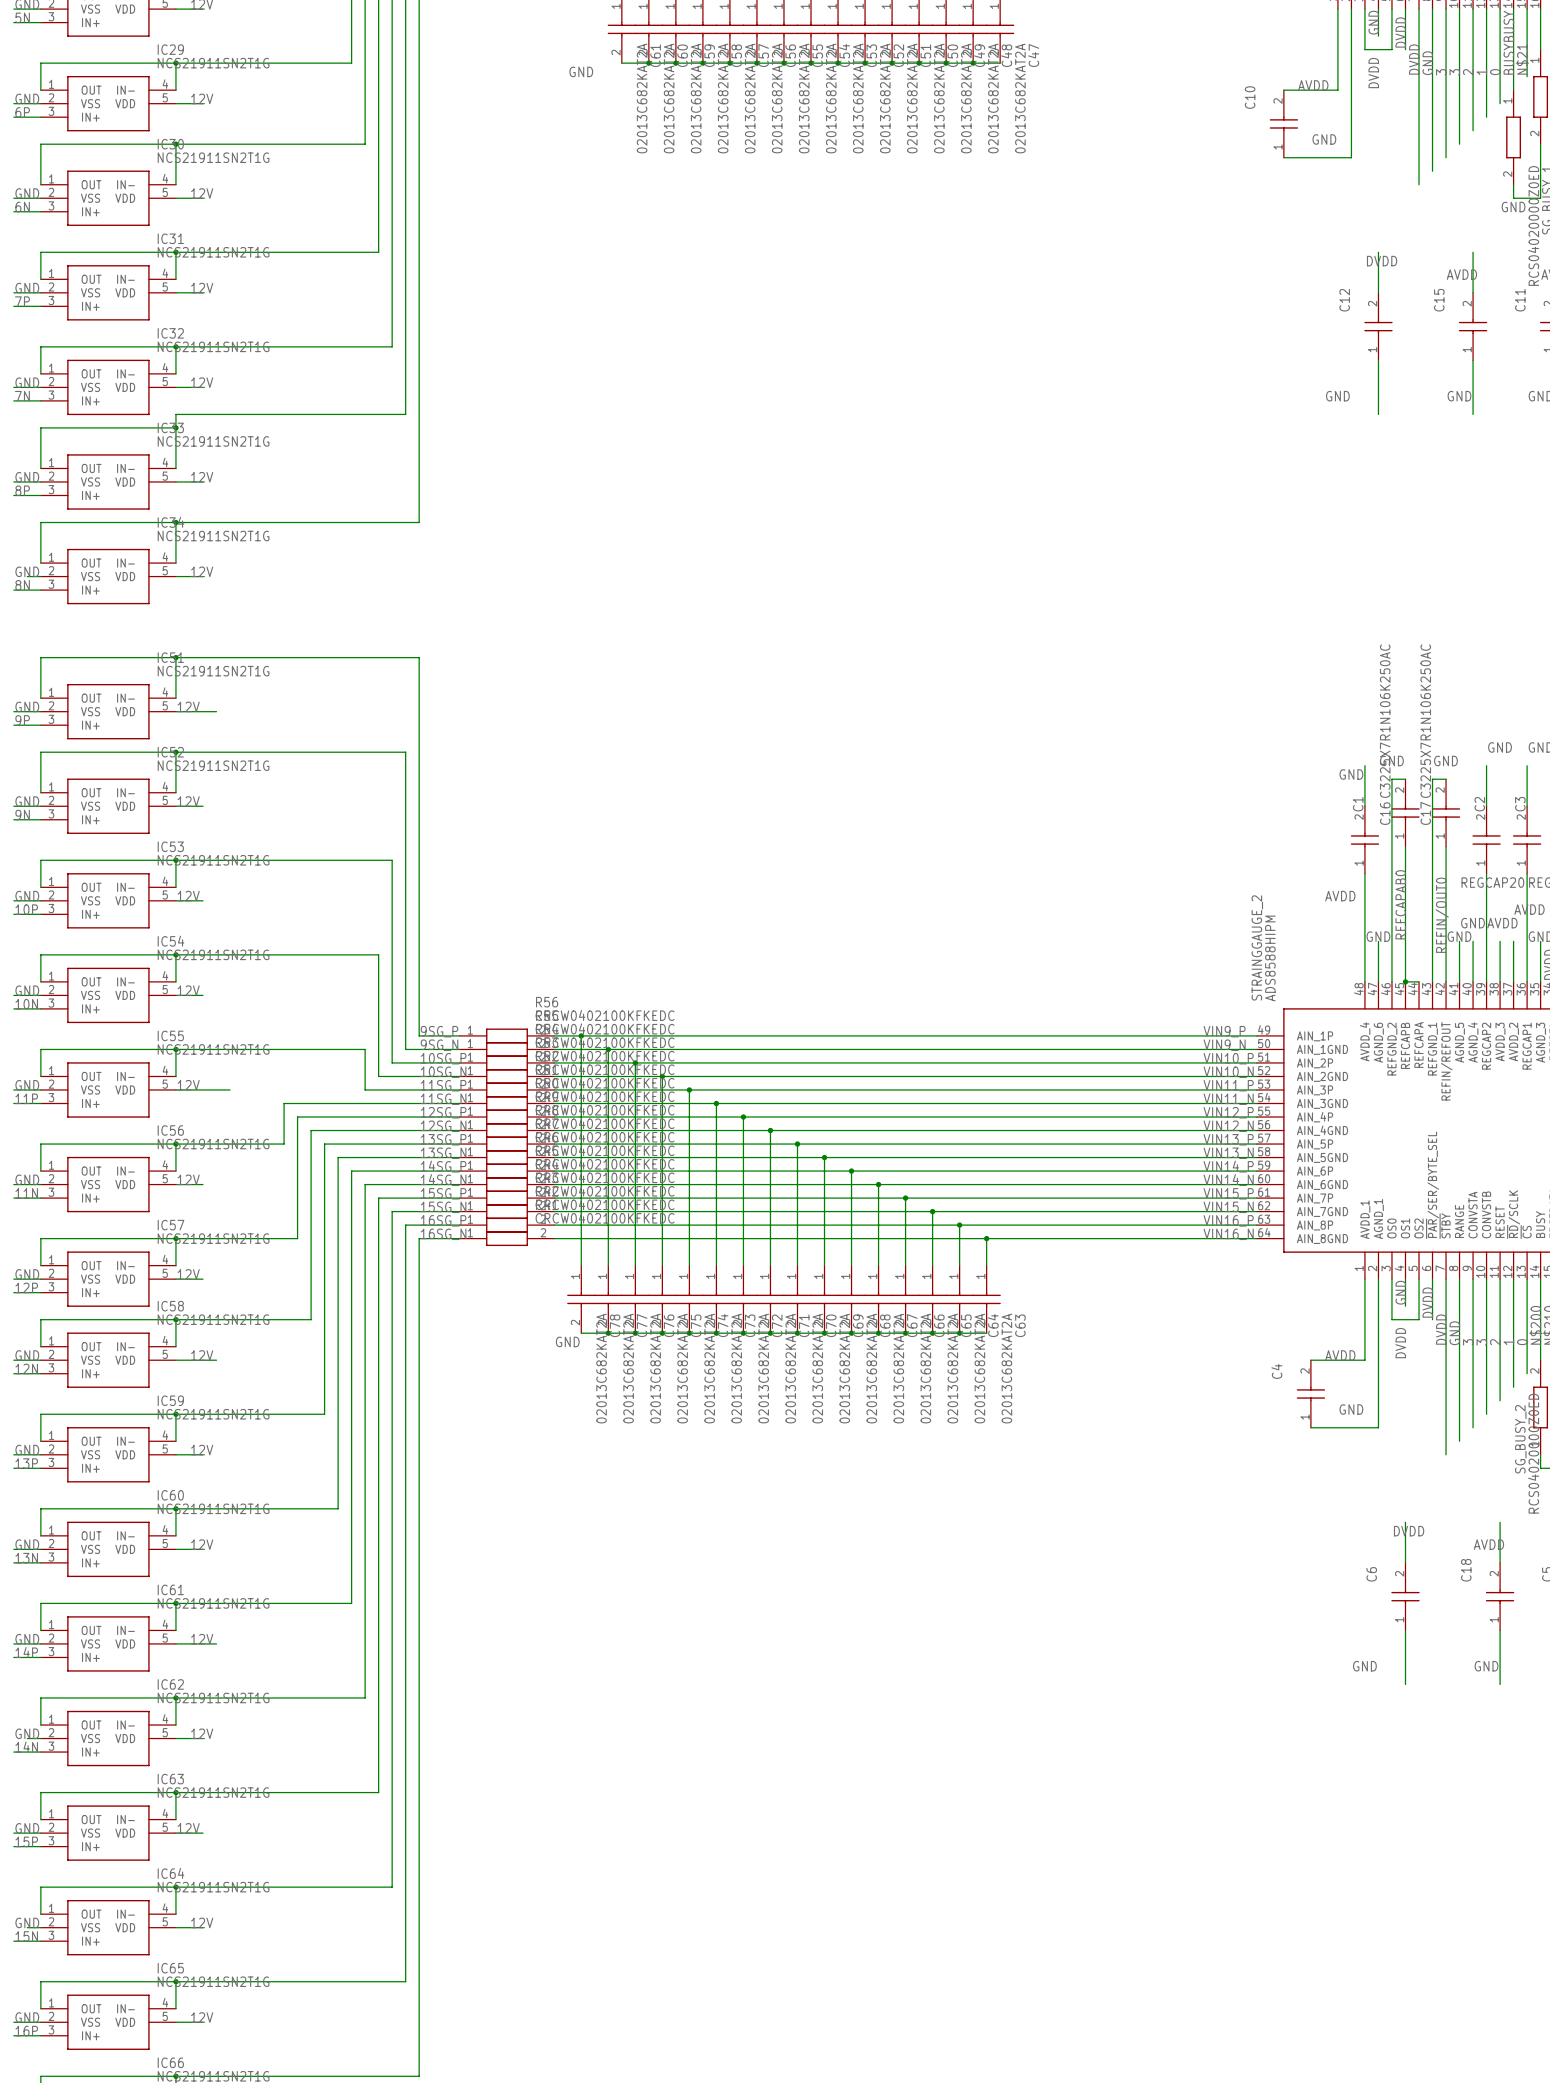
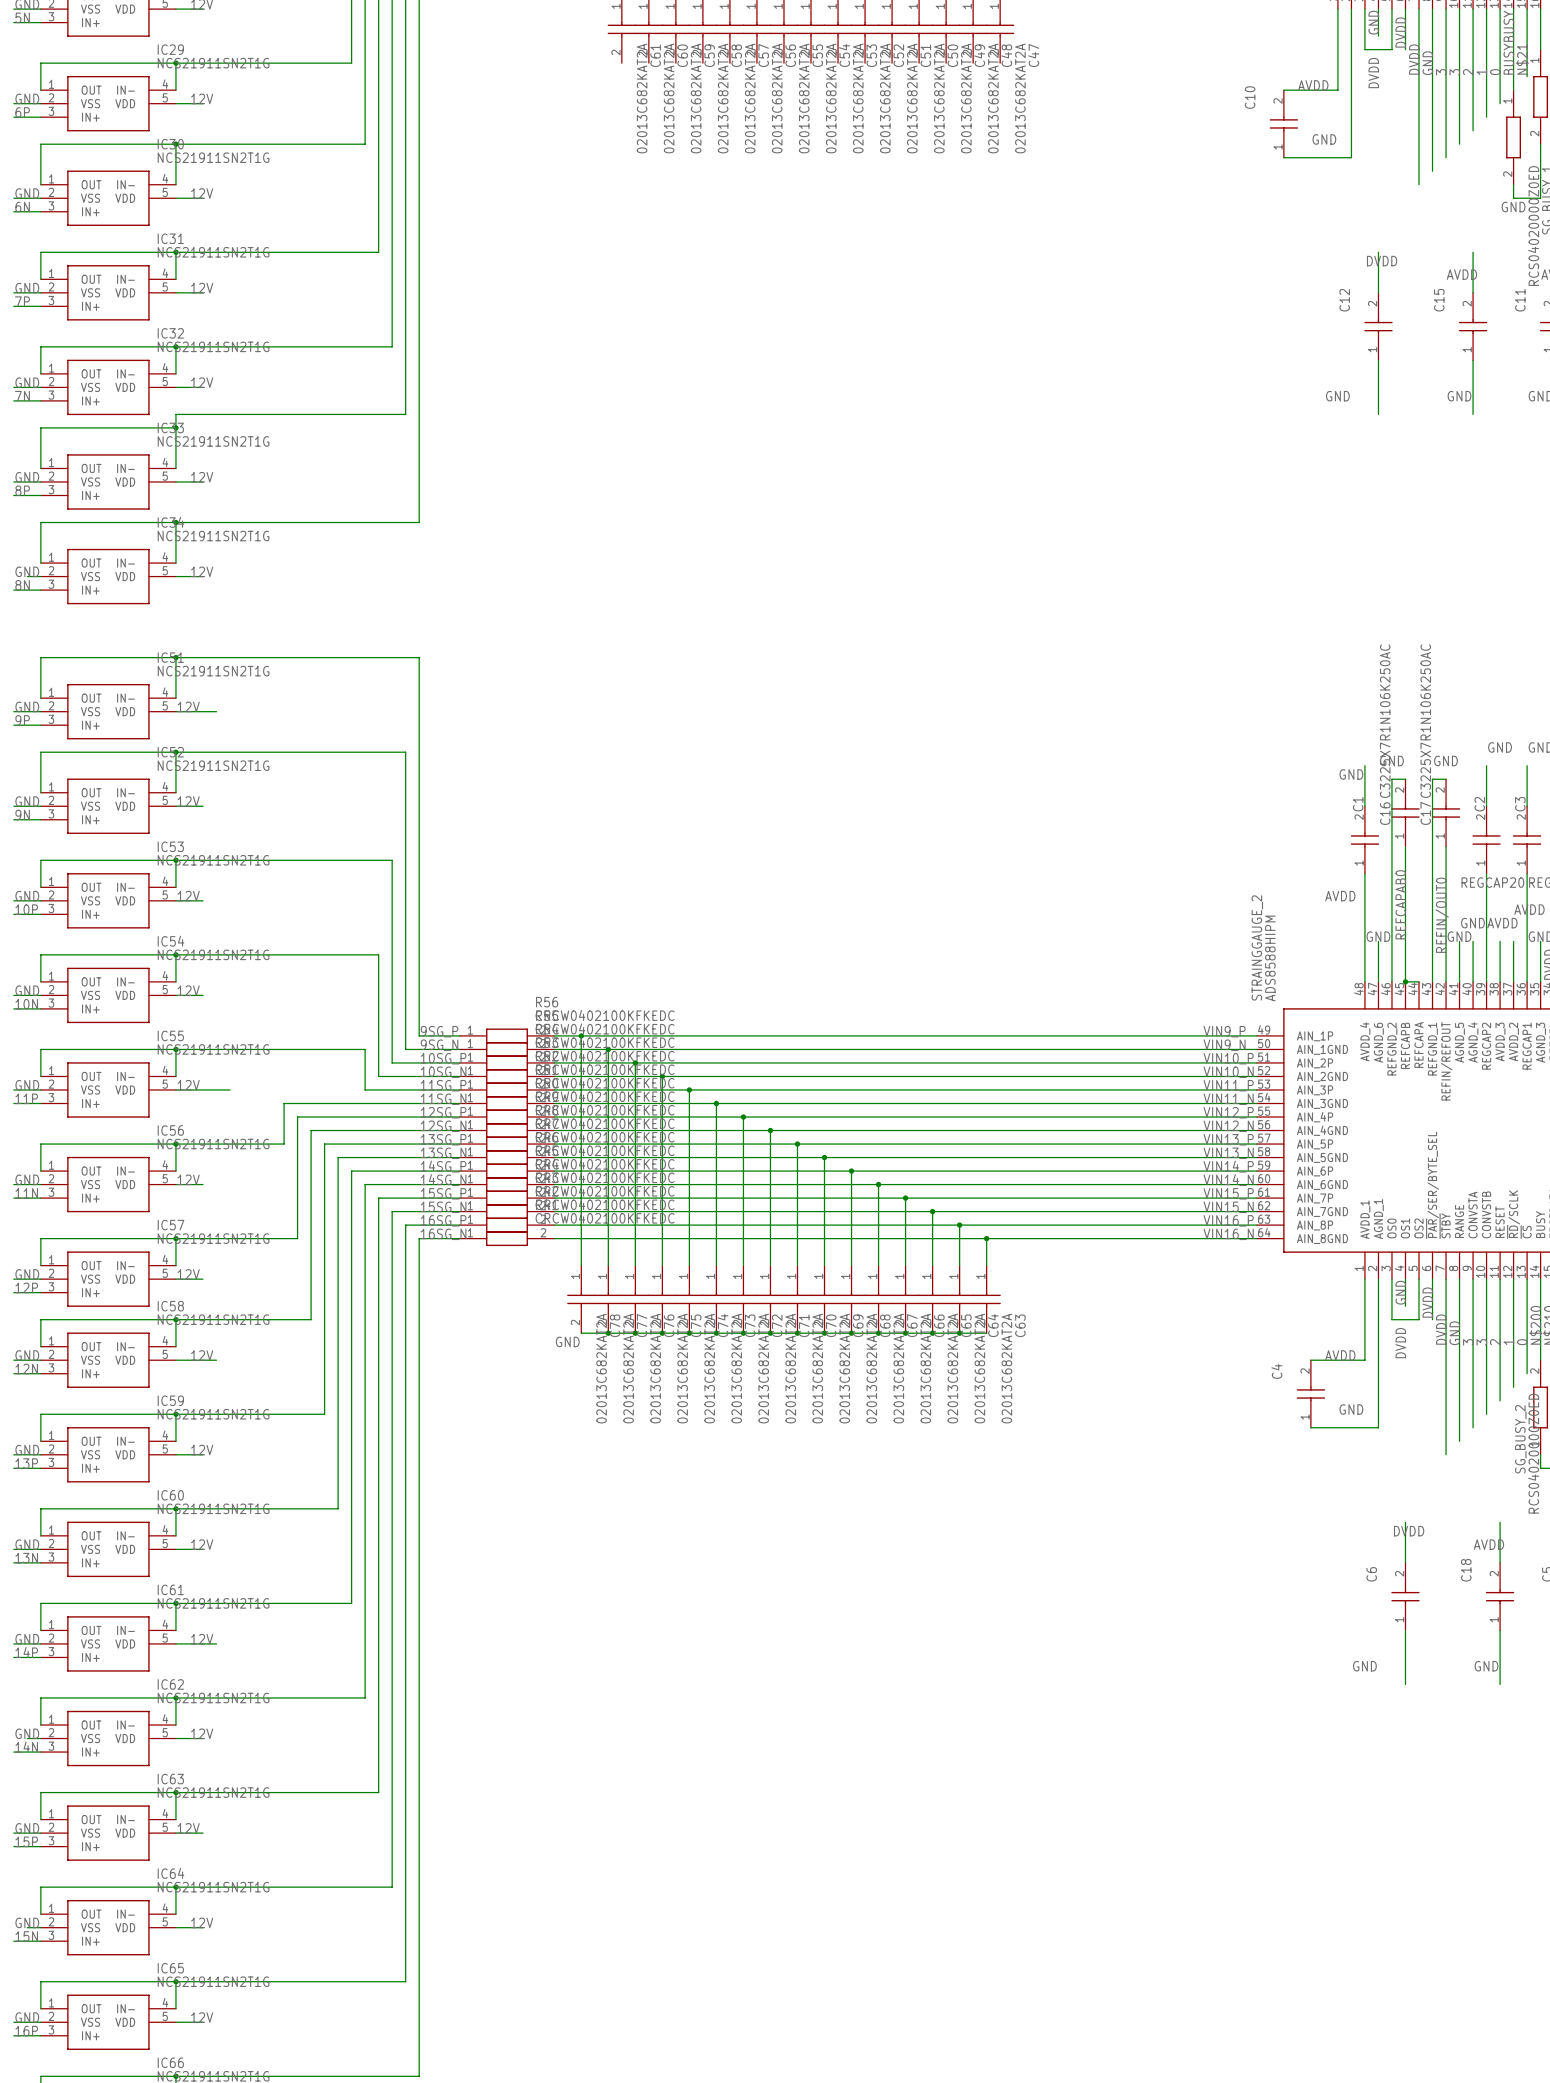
wire: (621, 63) (1000, 63) -> none
junction: (648, 63) -> none
junction: (675, 63) -> none
junction: (702, 63) -> none
junction: (729, 63) -> none
junction: (756, 63) -> none
junction: (783, 63) -> none
junction: (811, 63) -> none
junction: (838, 63) -> none
junction: (865, 63) -> none
junction: (892, 63) -> none
junction: (919, 63) -> none
junction: (946, 63) -> none
junction: (973, 63) -> none
label: GND (581, 71) -> none

